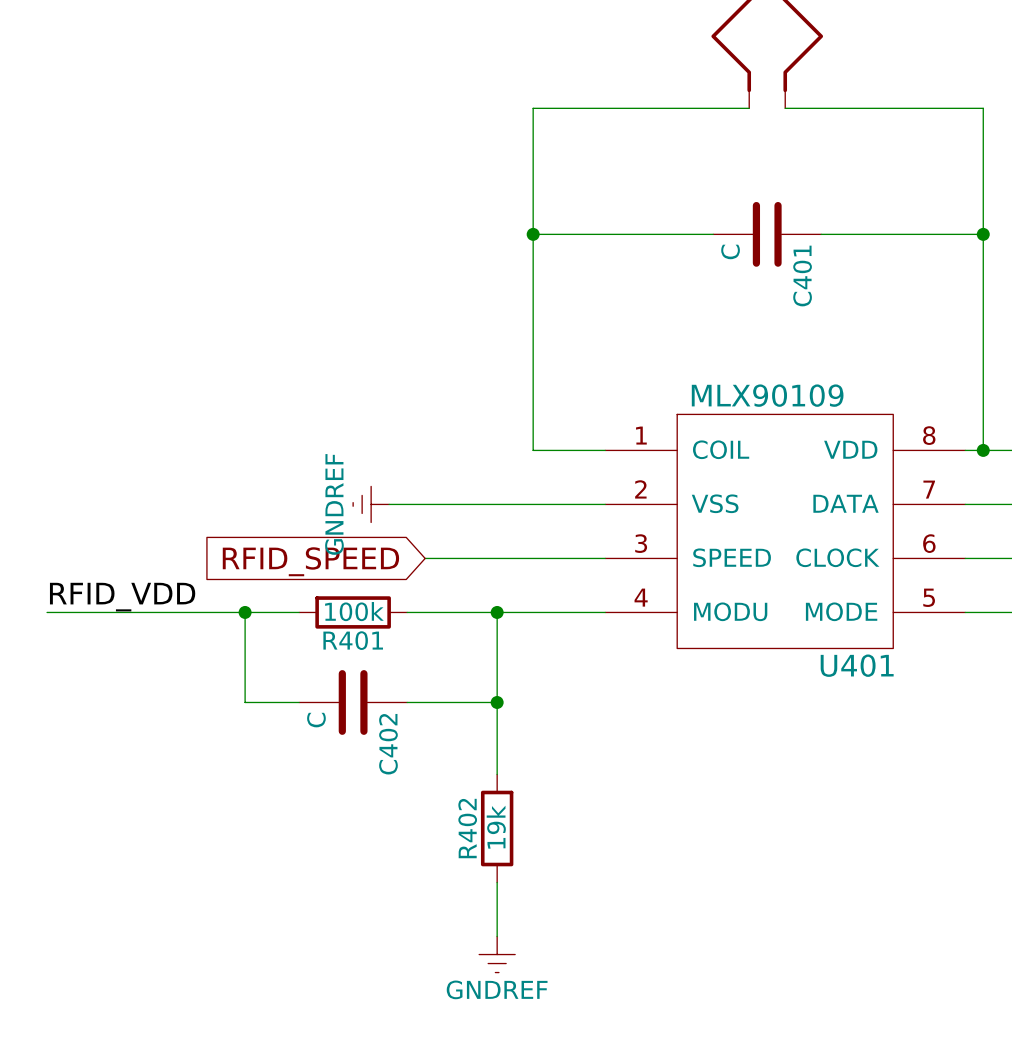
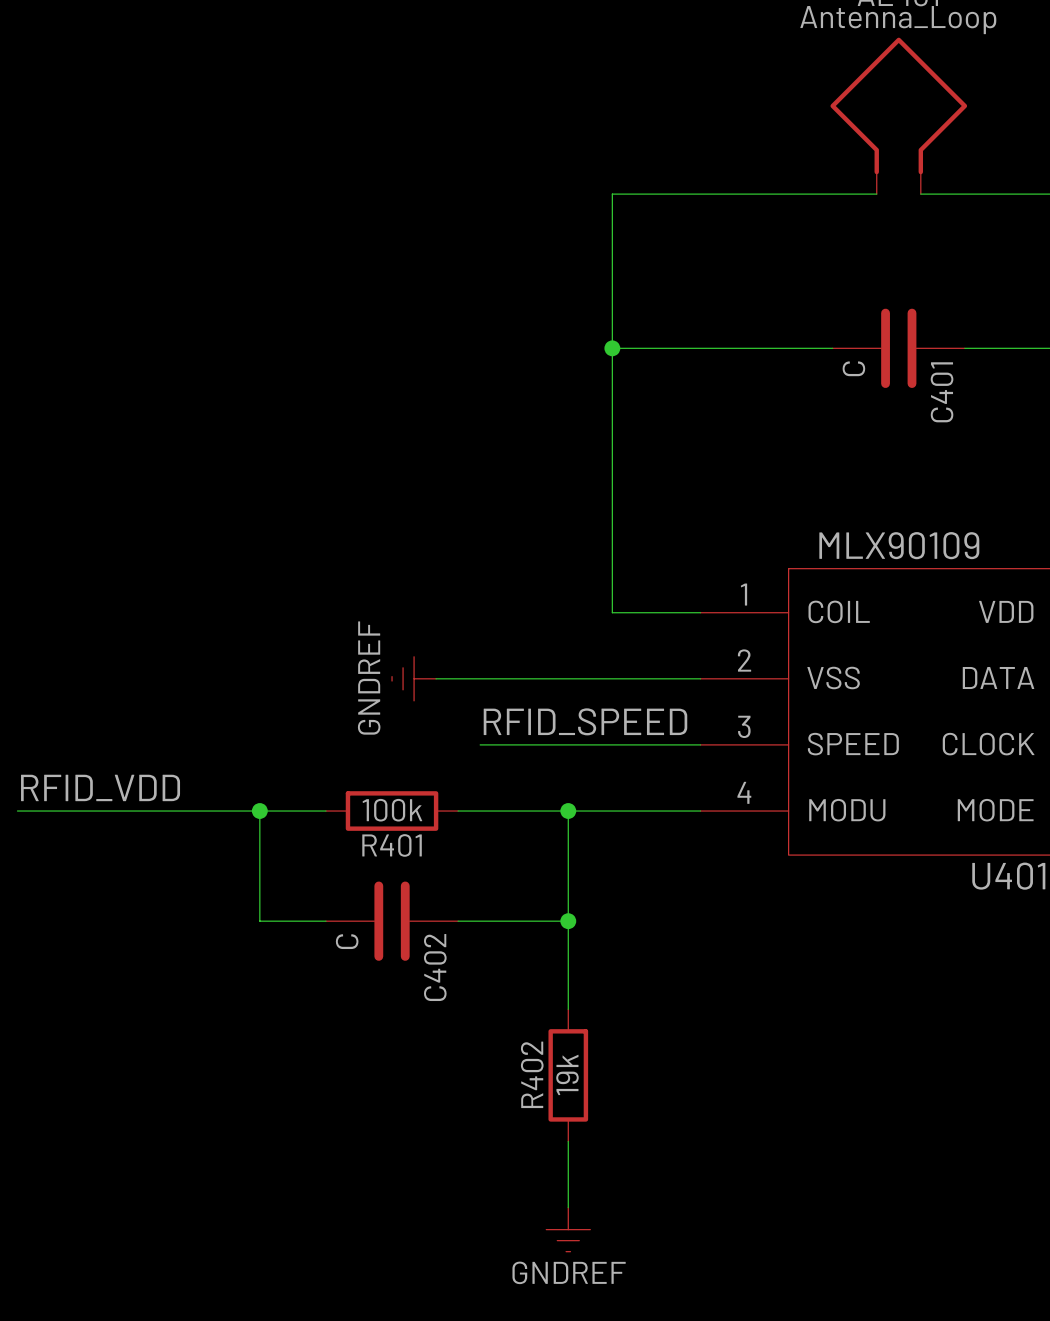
label: none -> RFID_SPEED (585, 721)
global label: RFID_SPEED (310, 561) -> none

